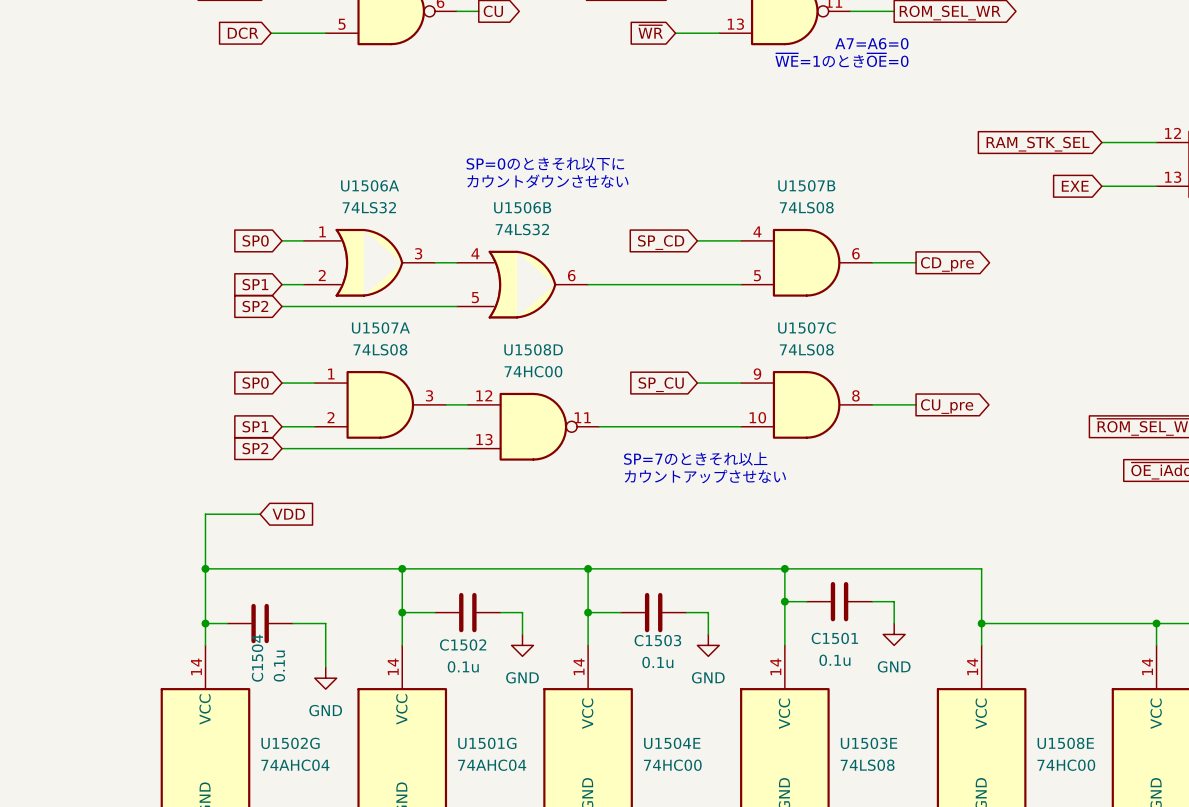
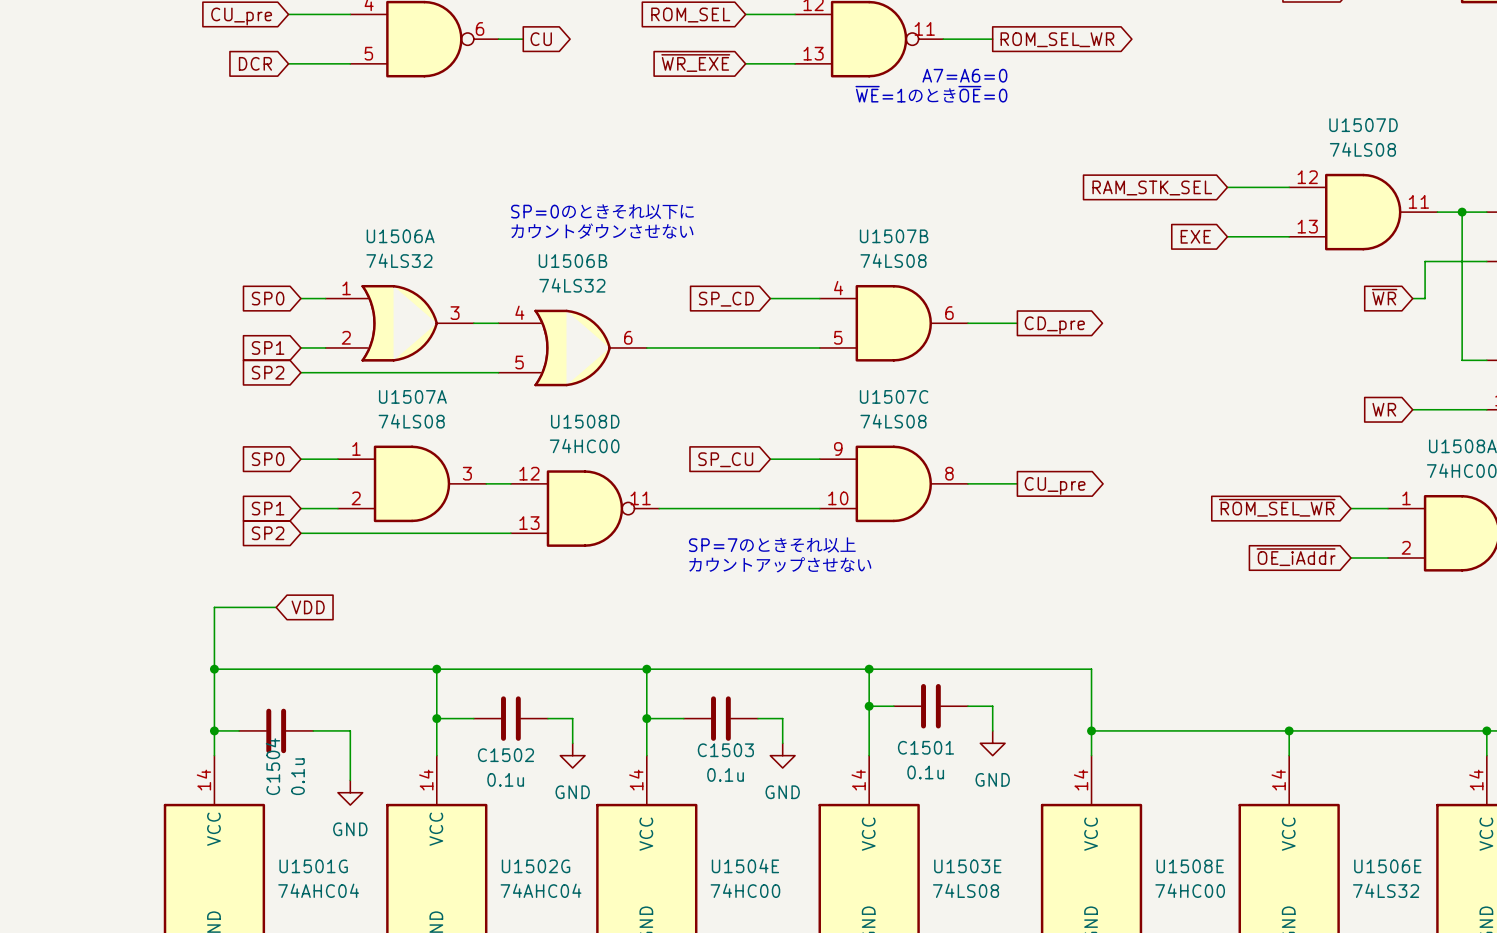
global label: ~{WR} (650, 31) -> ~{WR_EXE} (695, 63)
U1502G name: U1502G (290, 743) -> U1501G (313, 866)
U1501G name: U1501G (487, 743) -> U1502G (536, 866)

